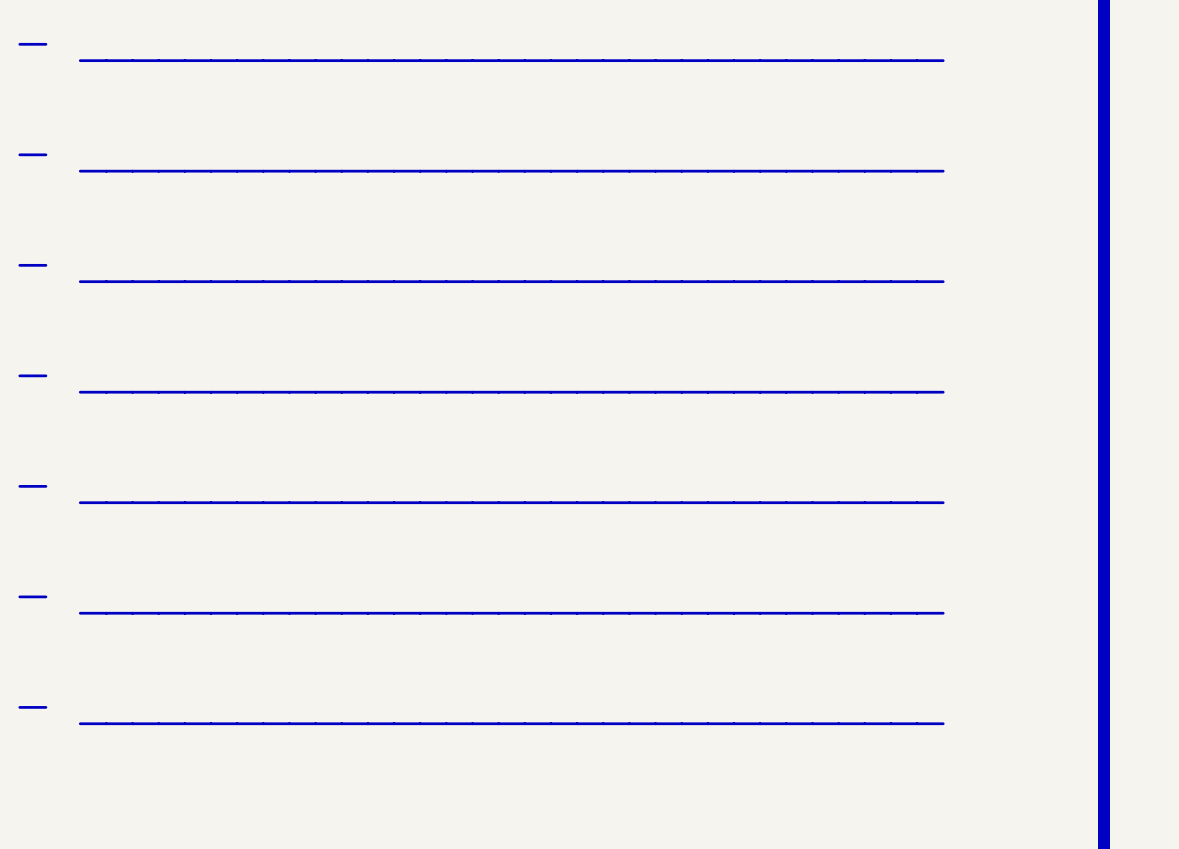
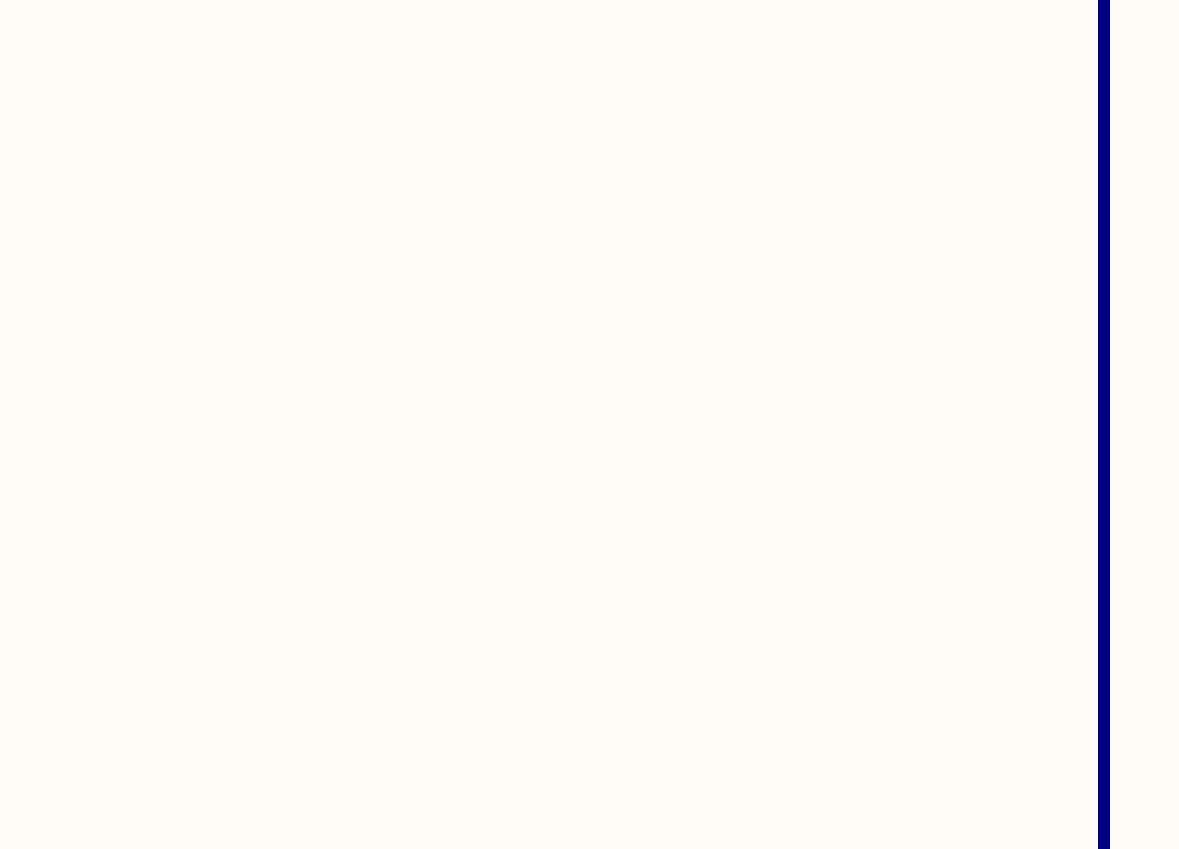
text: - _________________________________ (481, 52) -> none
text: - _________________________________ (481, 162) -> none
text: - _________________________________ (481, 273) -> none
text: - _________________________________ (481, 384) -> none
text: - _________________________________ (481, 494) -> none
text: - _________________________________ (481, 605) -> none
text: - _________________________________ (481, 715) -> none

